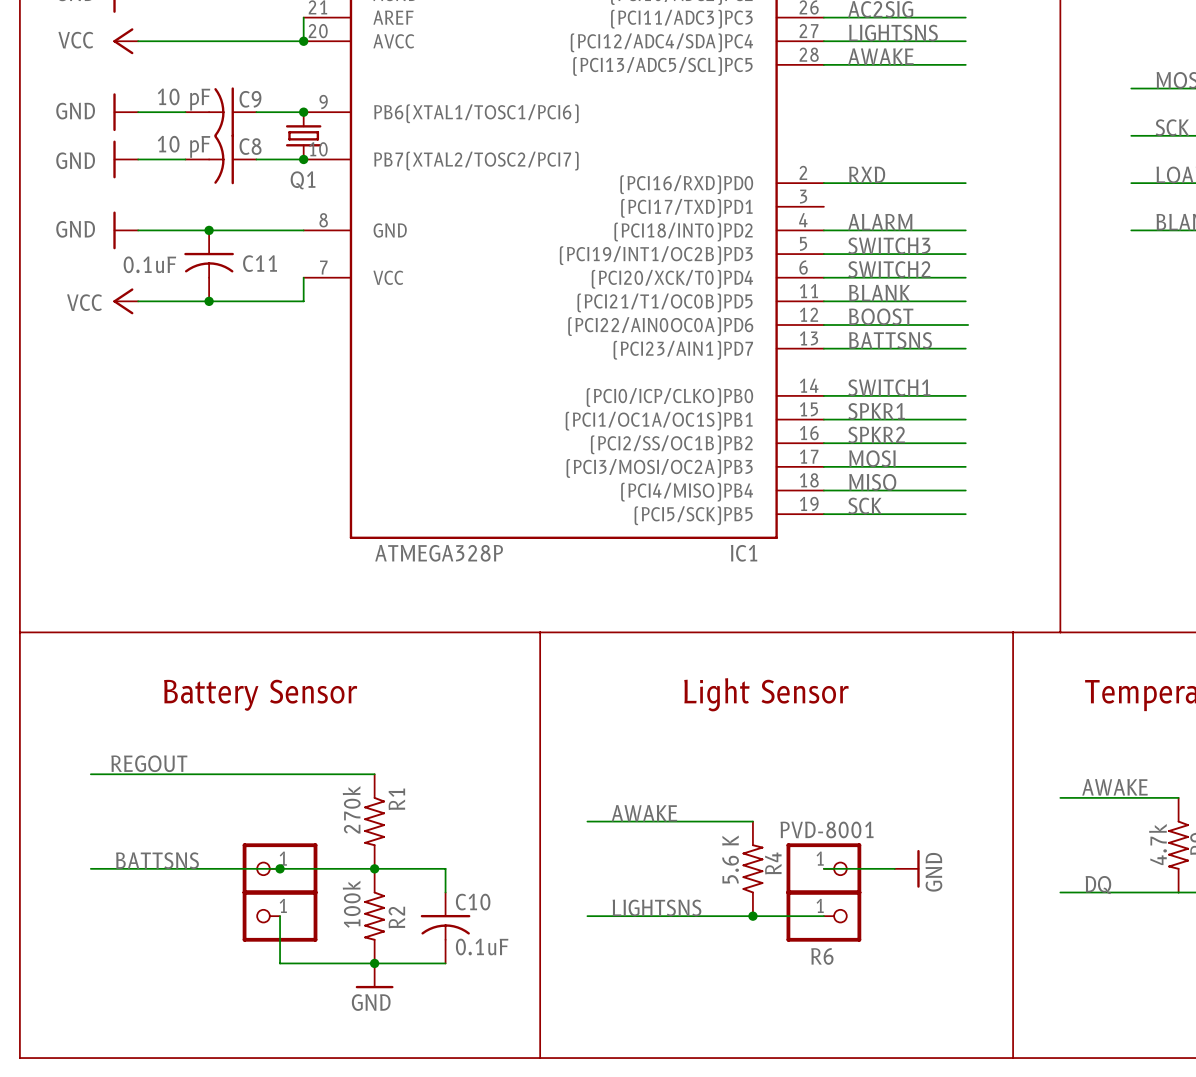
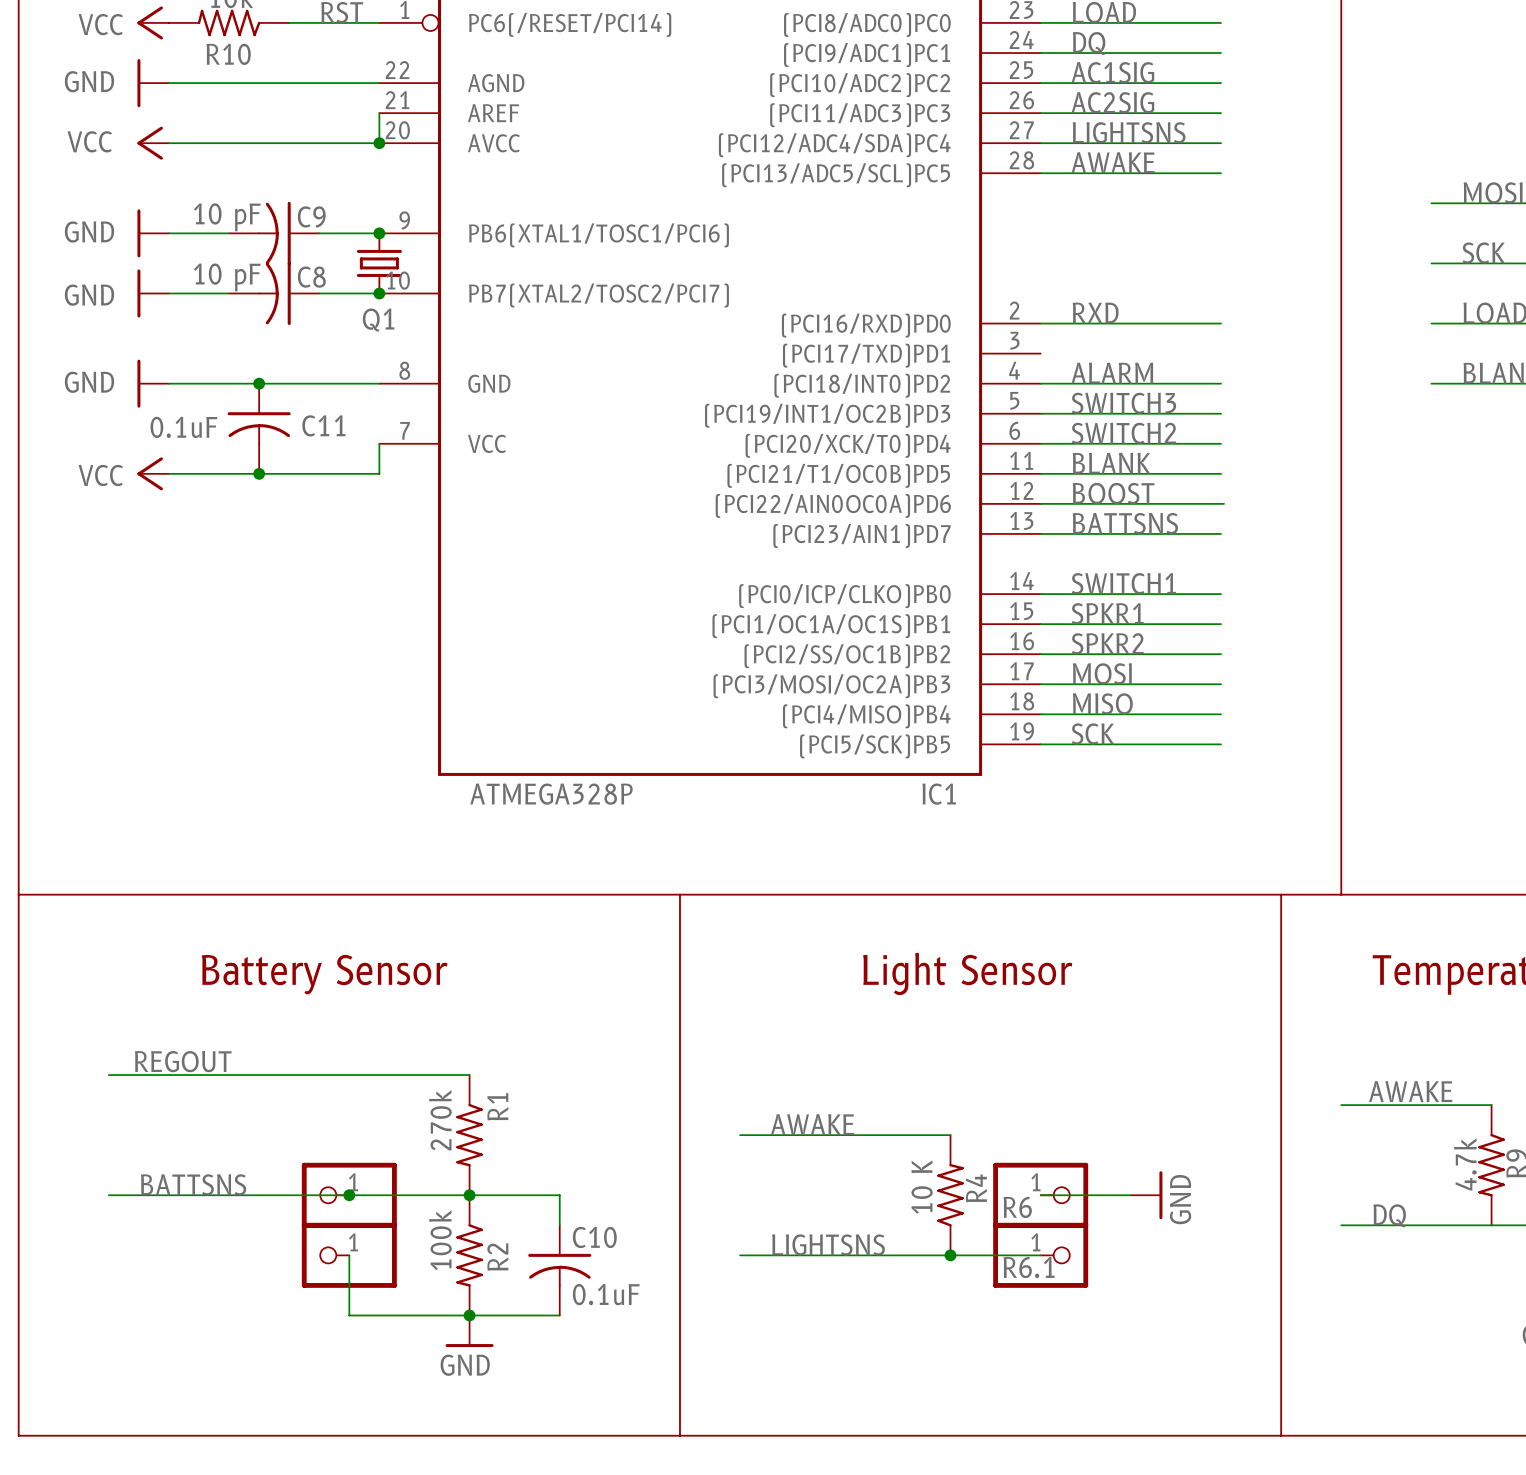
R6 value: PVD-8001 (827, 829) -> none
R4 value: 5.6 K (730, 859) -> 10 K (922, 1187)
R6.1 name: none -> R6.1 (1029, 1267)
R6 name position: R6 (822, 956) -> R6 (1017, 1207)

